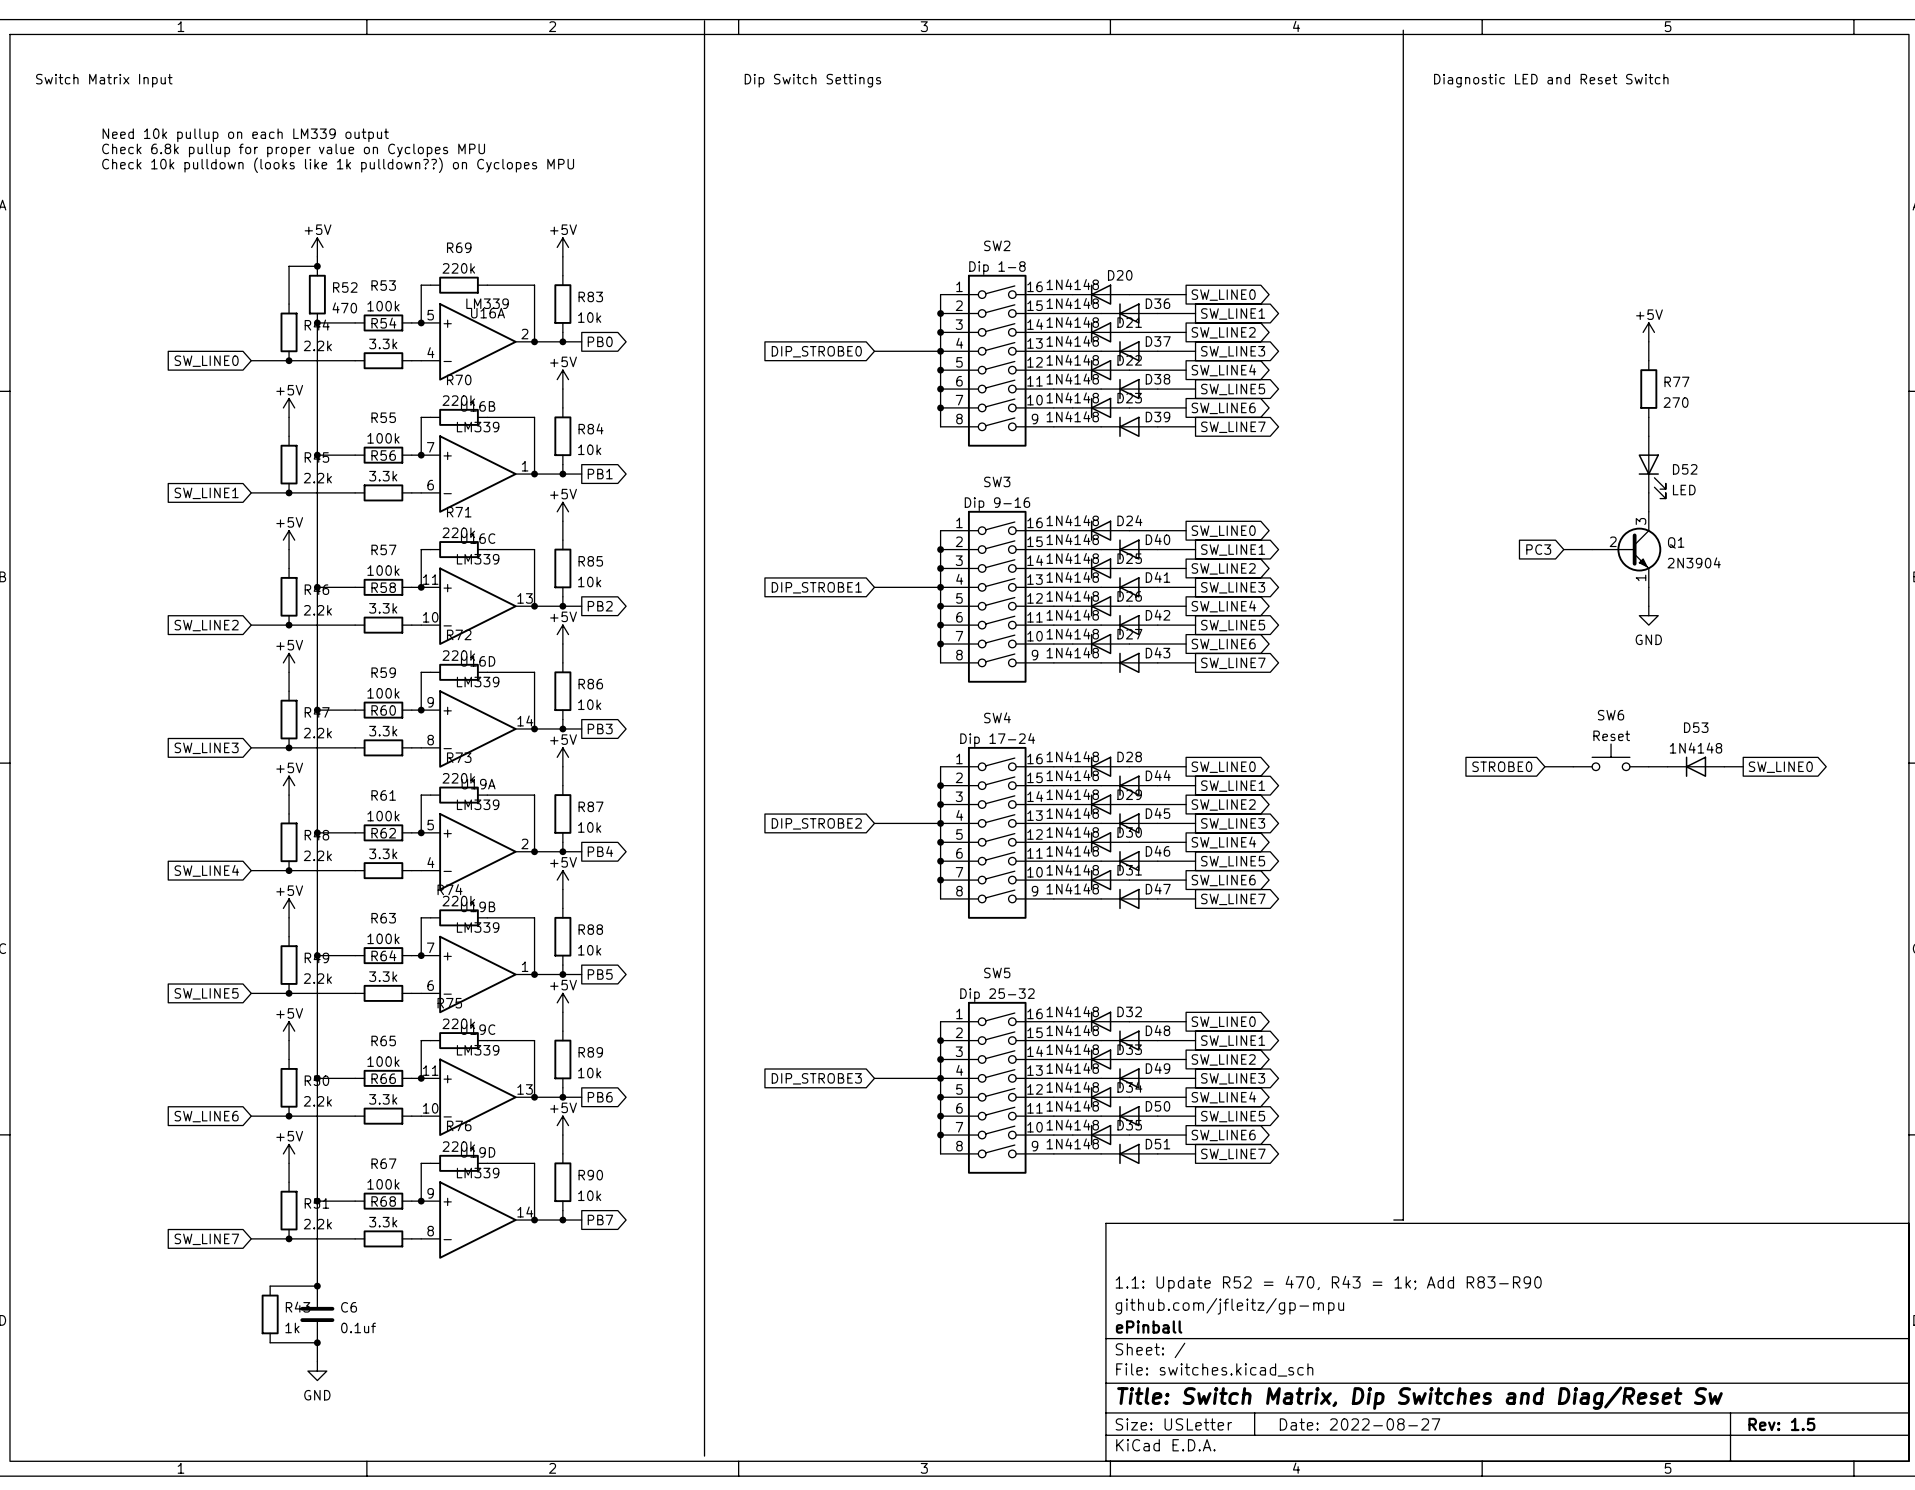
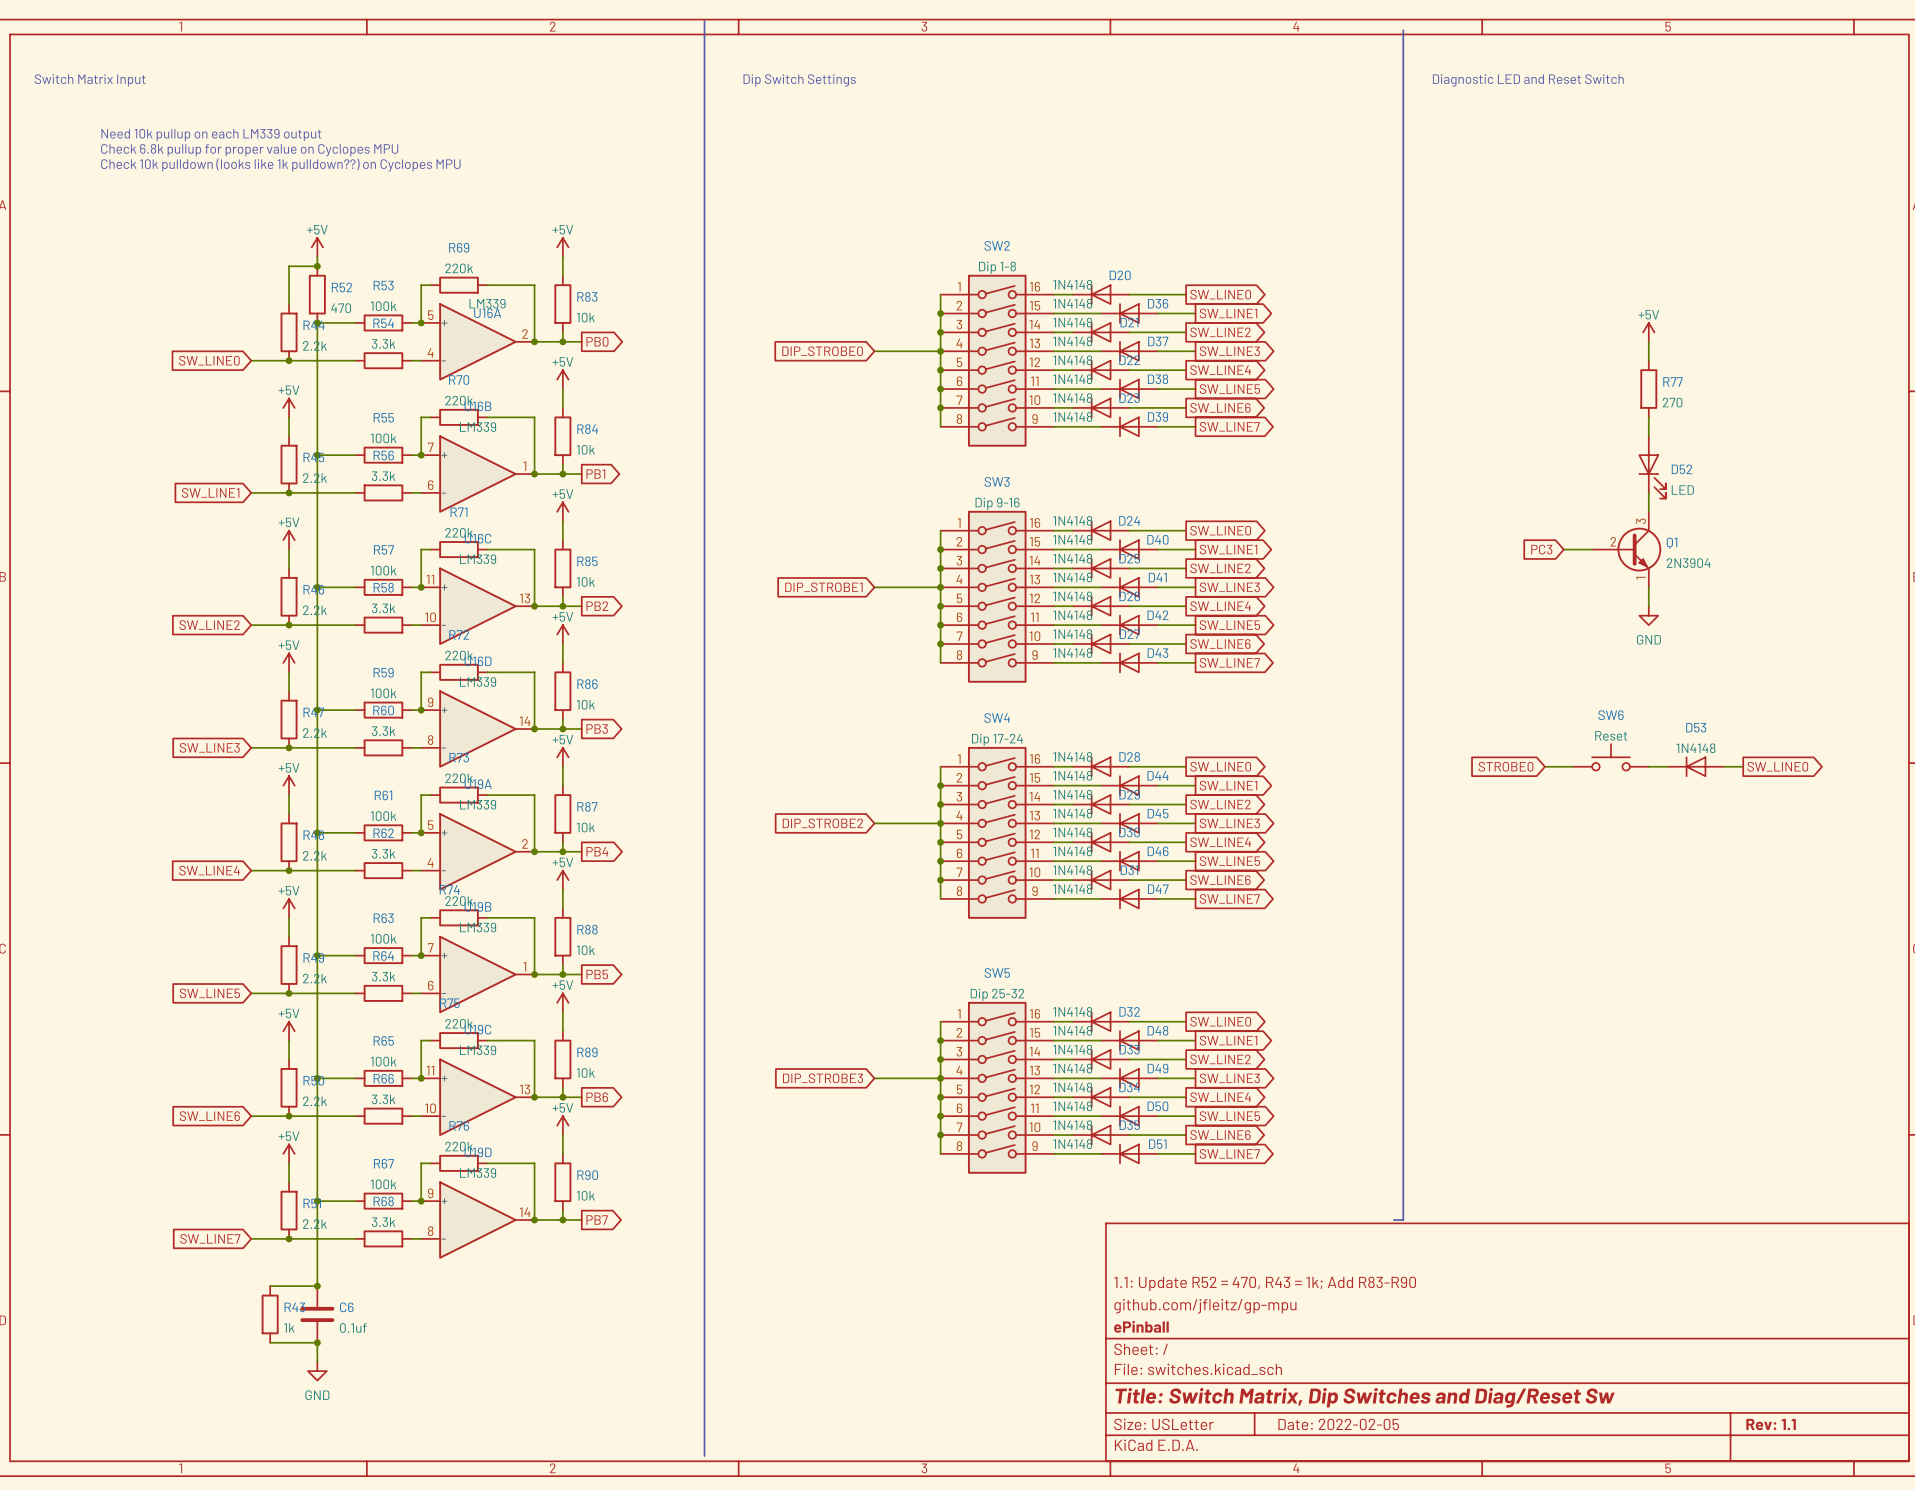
title block: Date: 2022-08-27 (1360, 1424) -> Date: 2022-02-05 (1338, 1424)
title block: Rev: 1.5 (1781, 1424) -> Rev: 1.1 (1771, 1424)

